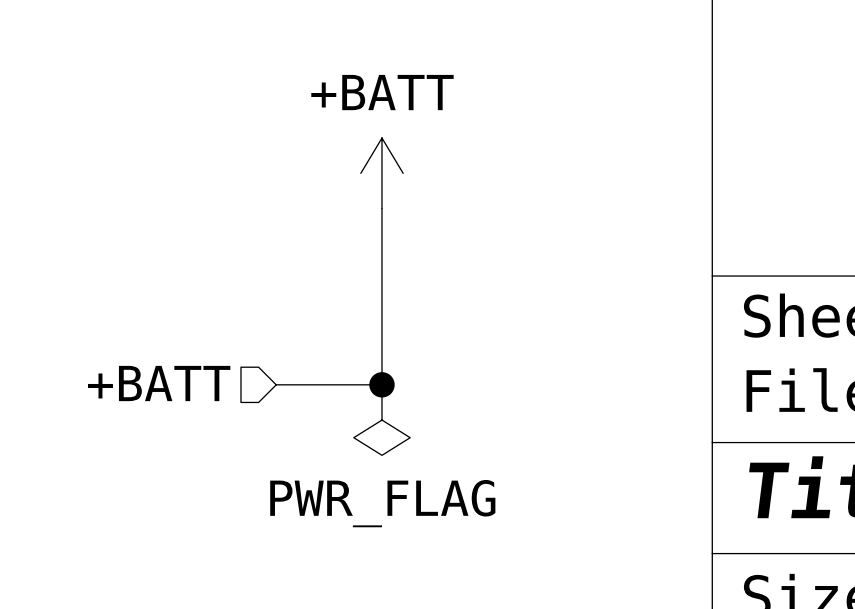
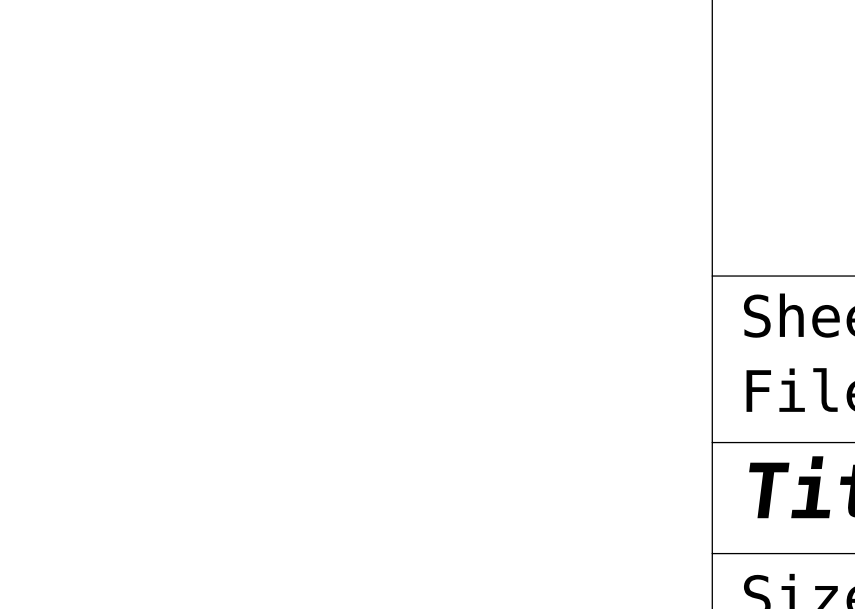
power symbol: +BATT (381, 173) -> none
wire: (381, 208) (381, 384) (276, 384) -> none
hierarchical label: +BATT (159, 383) -> none
junction: (381, 384) -> none
power symbol: PWR_FLAG (381, 420) -> none

